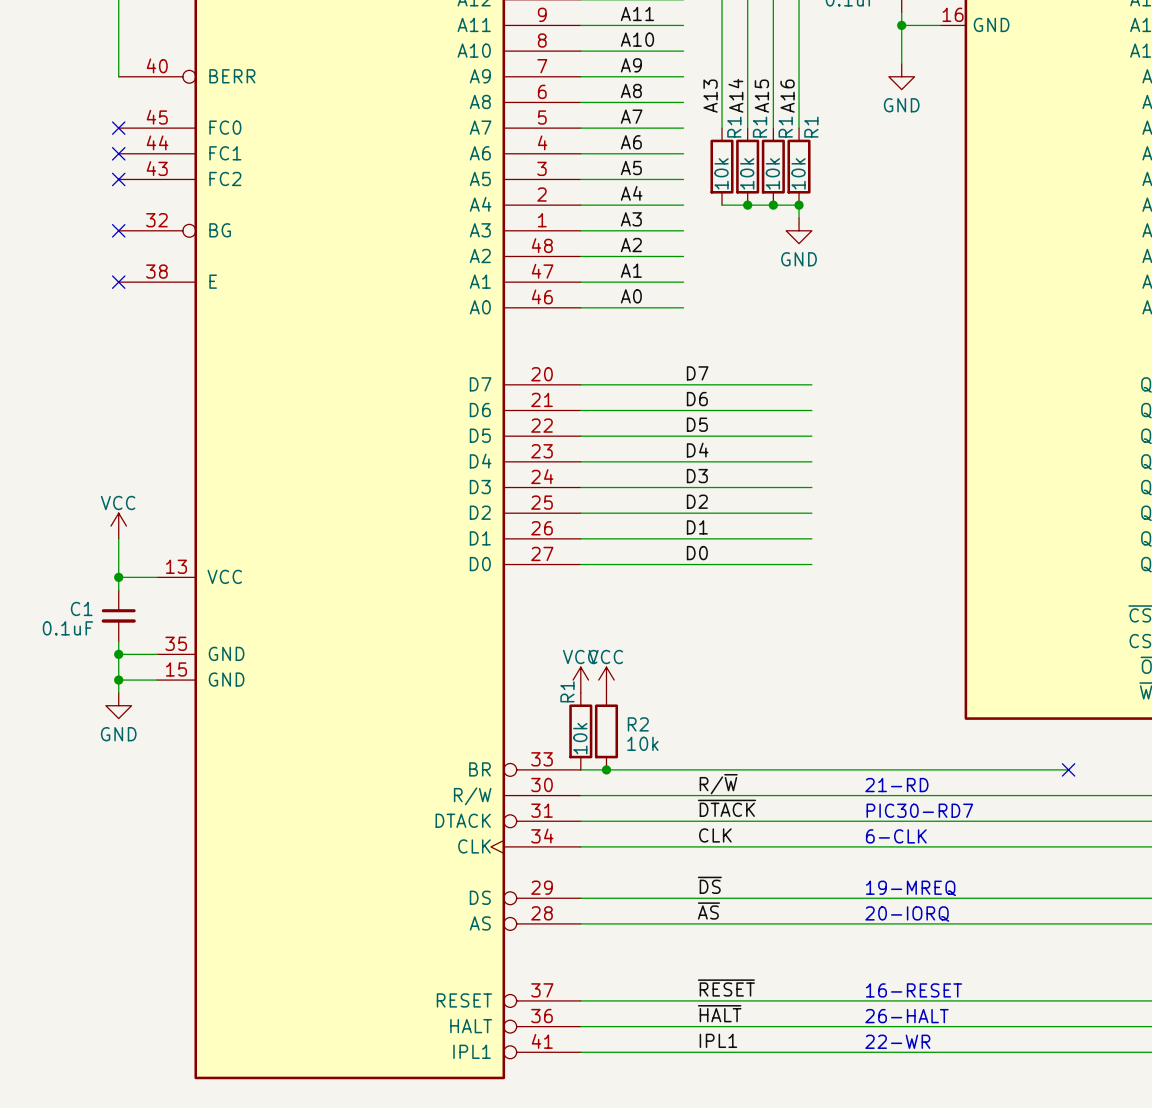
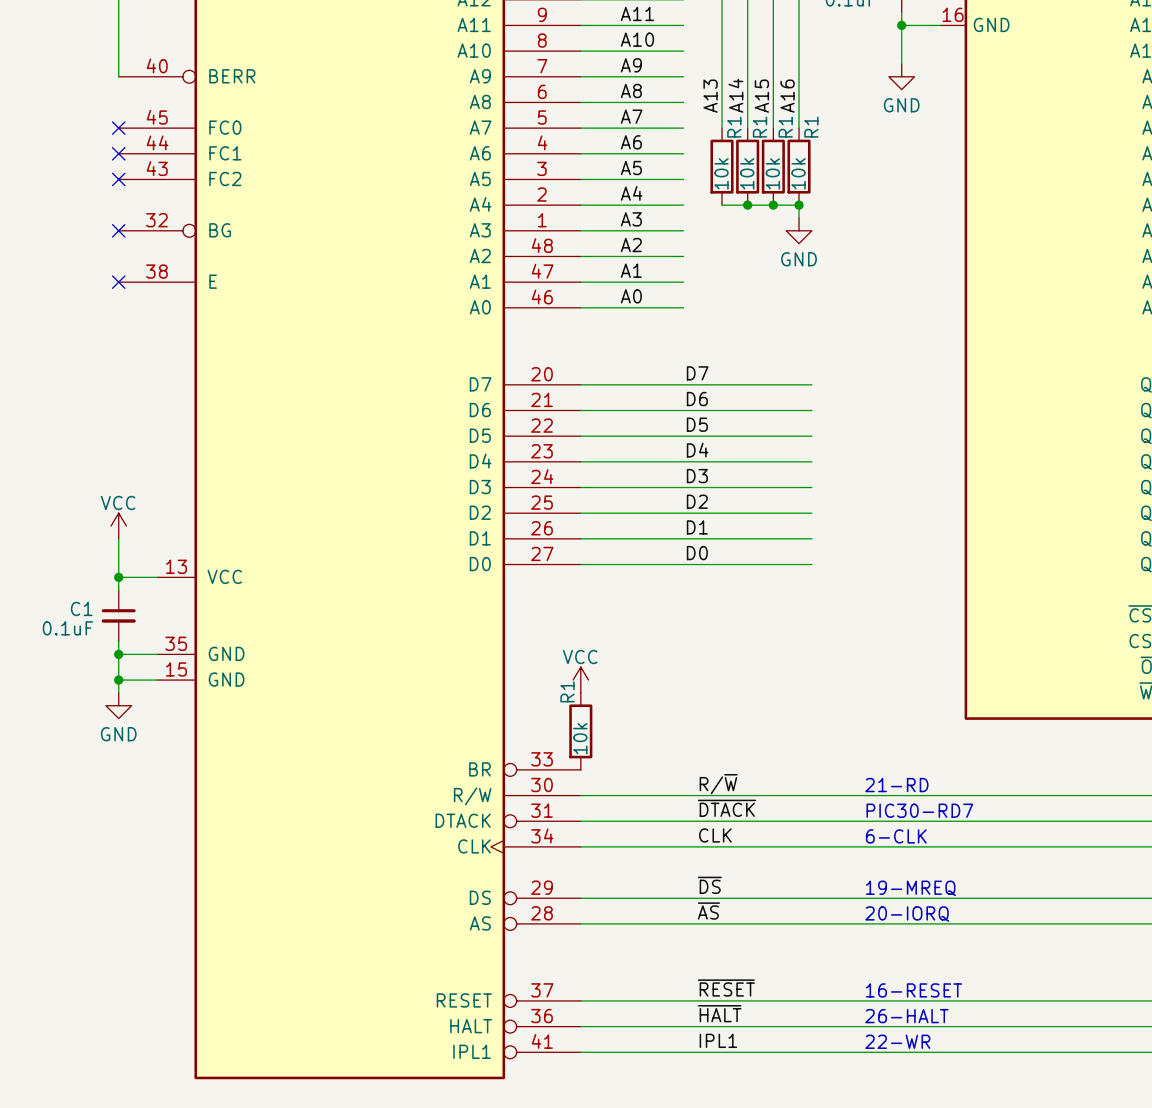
power symbol: VCC (606, 680) -> none
R2: 10k (606, 731) -> none
wire: (580, 769) (1068, 769) -> none
junction: (606, 769) -> none
no-connect mark: (1068, 769) -> none

